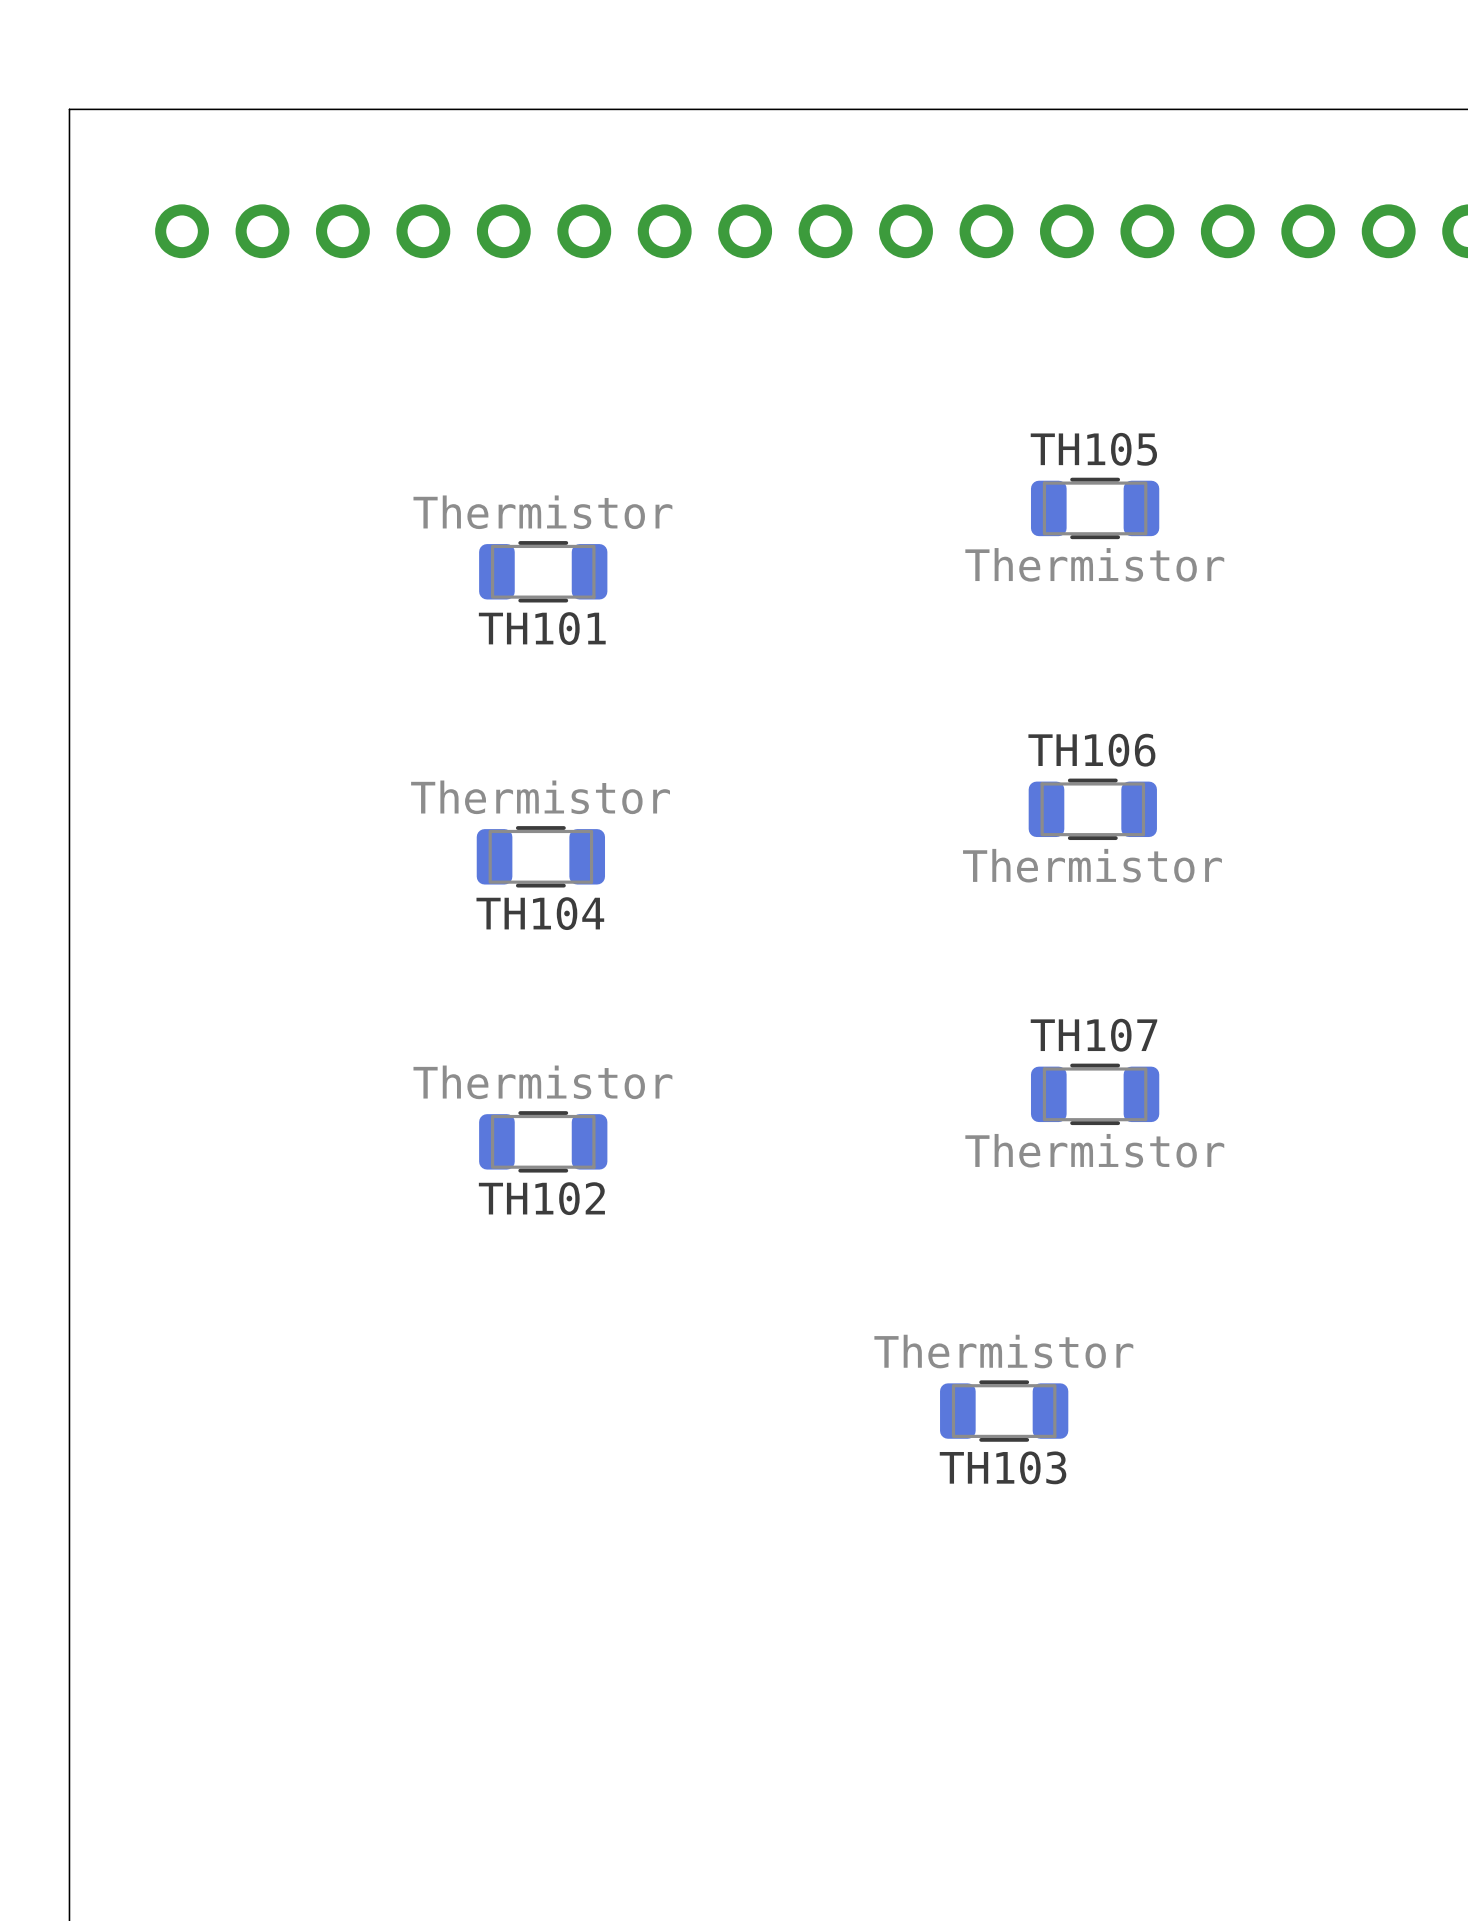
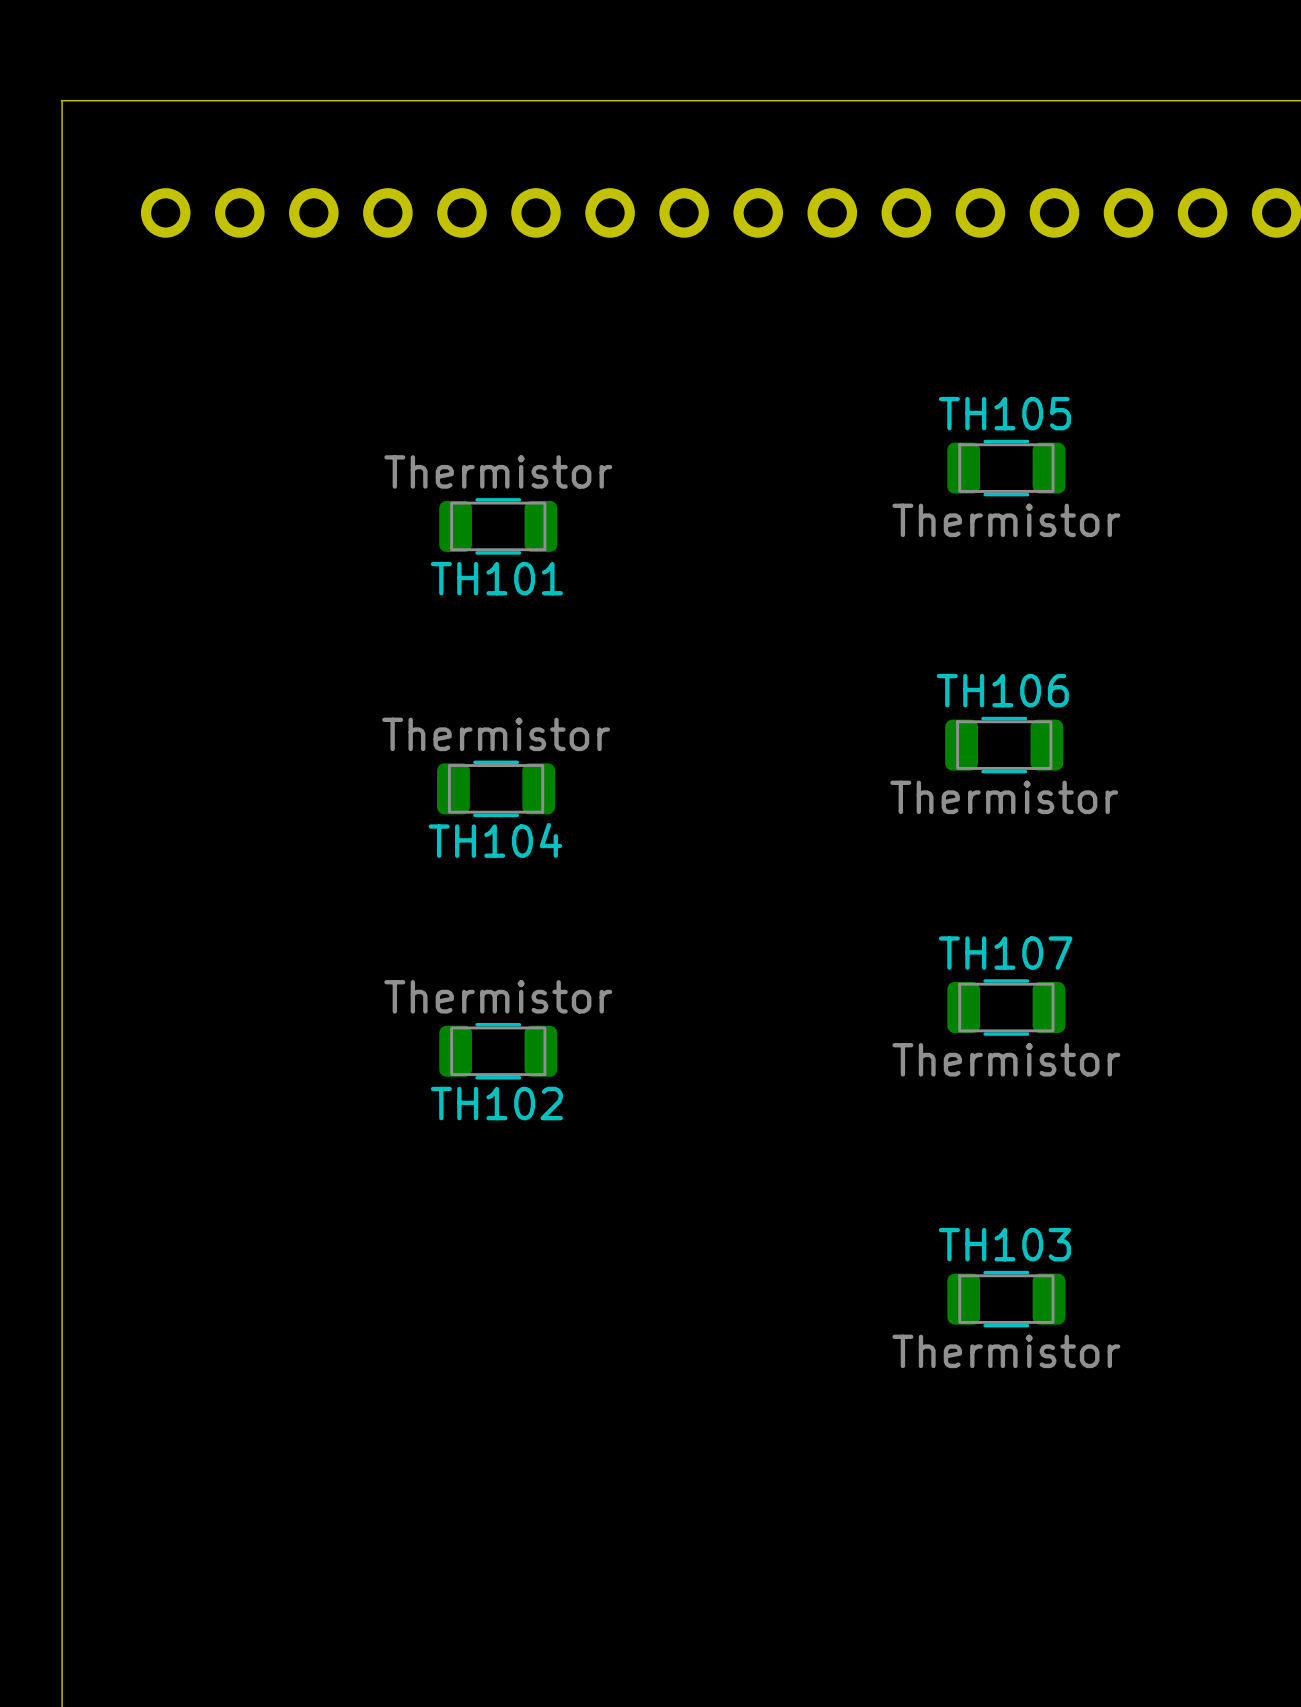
TH103 value position: Thermistor (1003, 1351) -> Thermistor (1006, 1351)
TH103 position: (1004, 1411) -> (1006, 1299)
TH103 name position: TH103 (1003, 1467) -> TH103 (1004, 1244)

